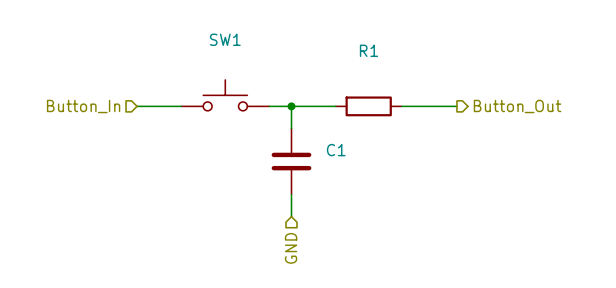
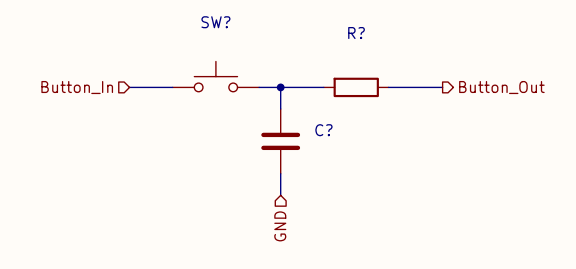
SW1 name: SW1 (225, 39) -> SW? (215, 22)
R1 name: R1 (368, 50) -> R? (356, 33)
C1 name: C1 (336, 150) -> C? (323, 130)

